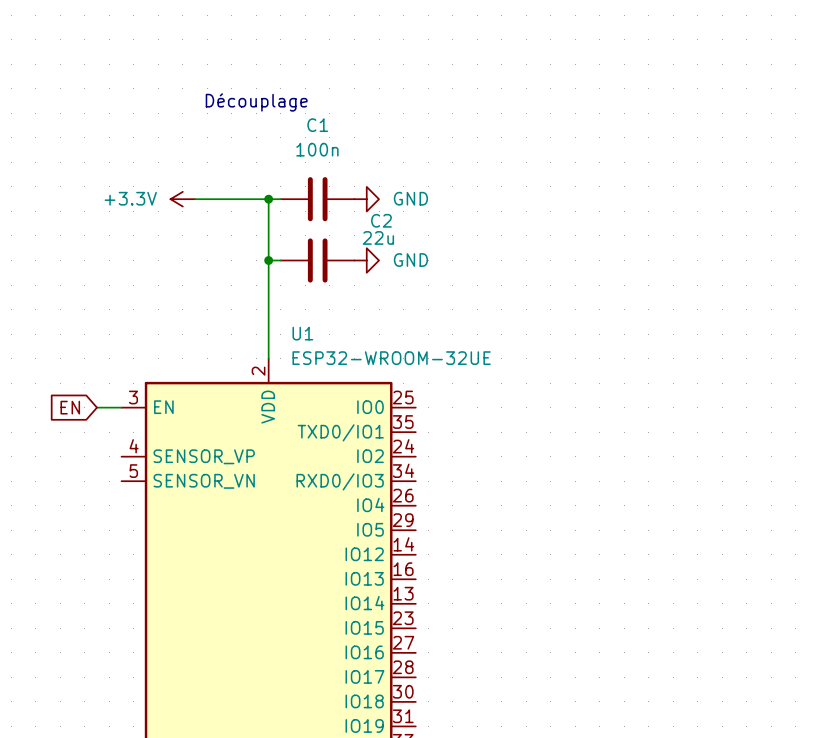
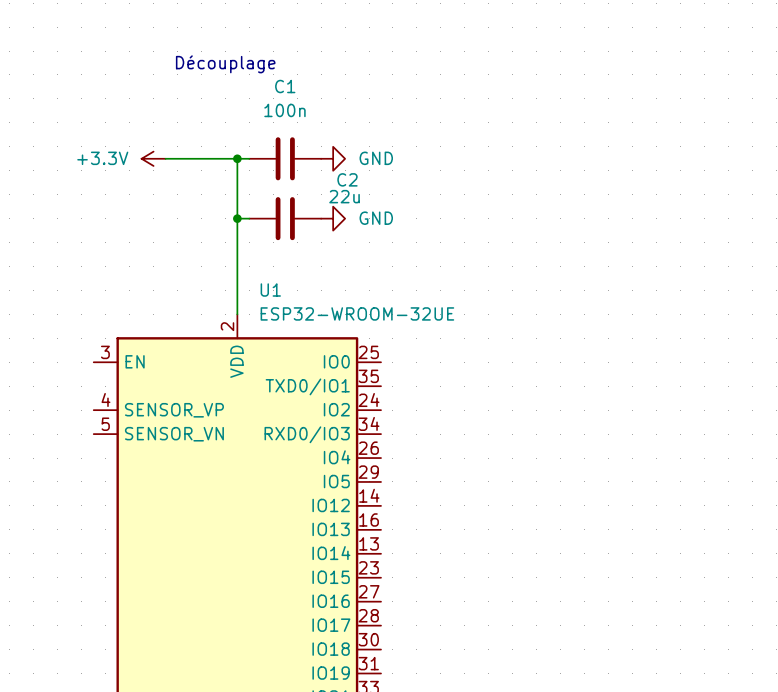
global label: EN (70, 407) -> none
wire: (96, 407) (121, 407) -> none

